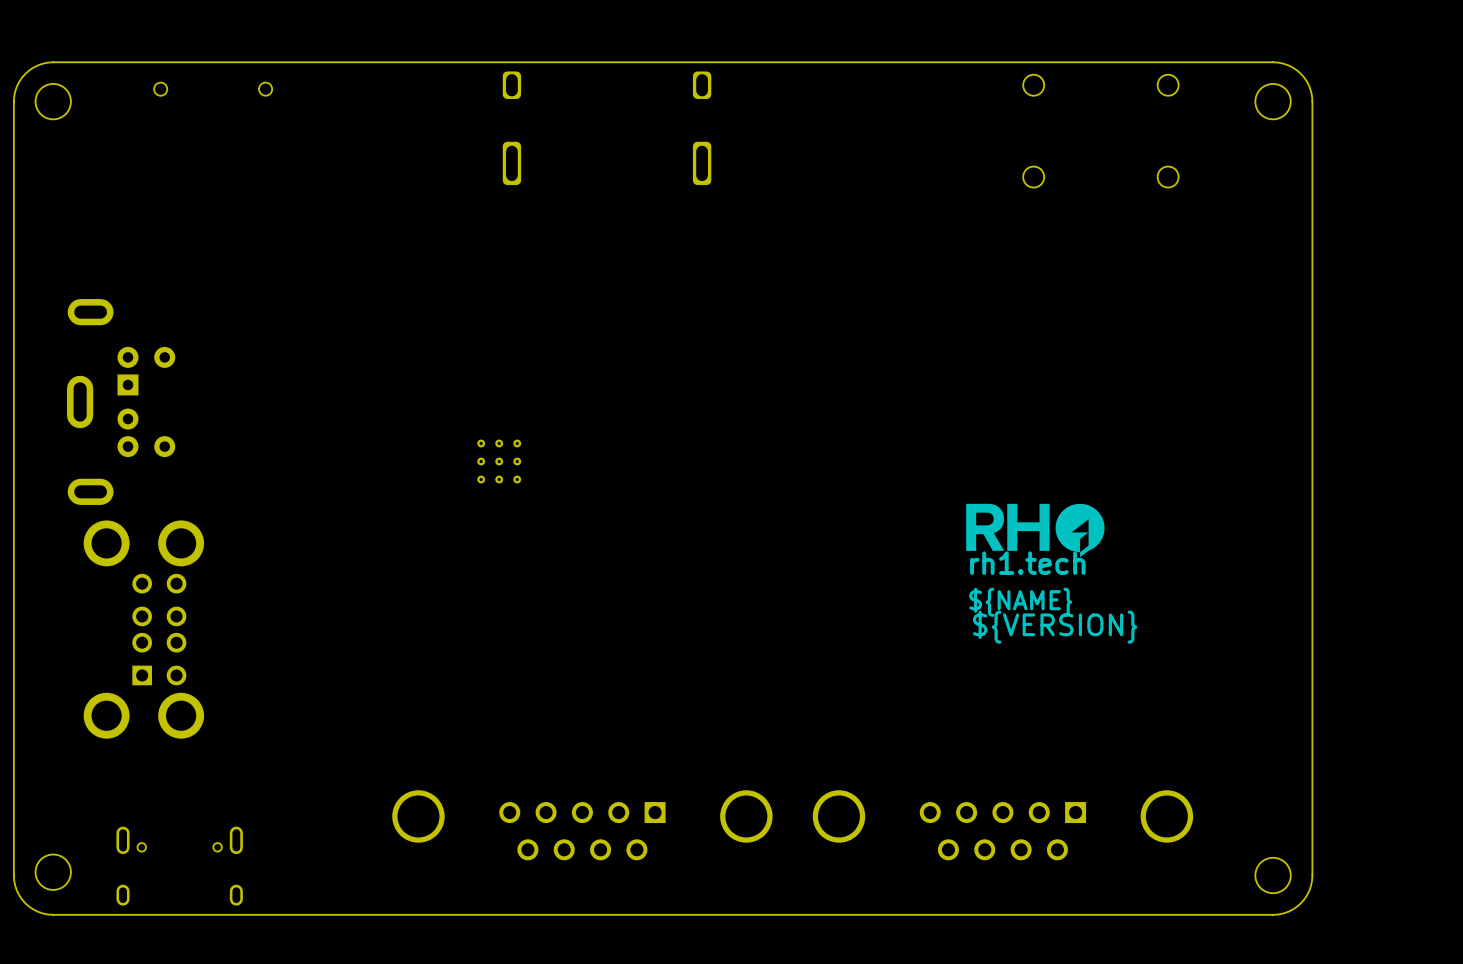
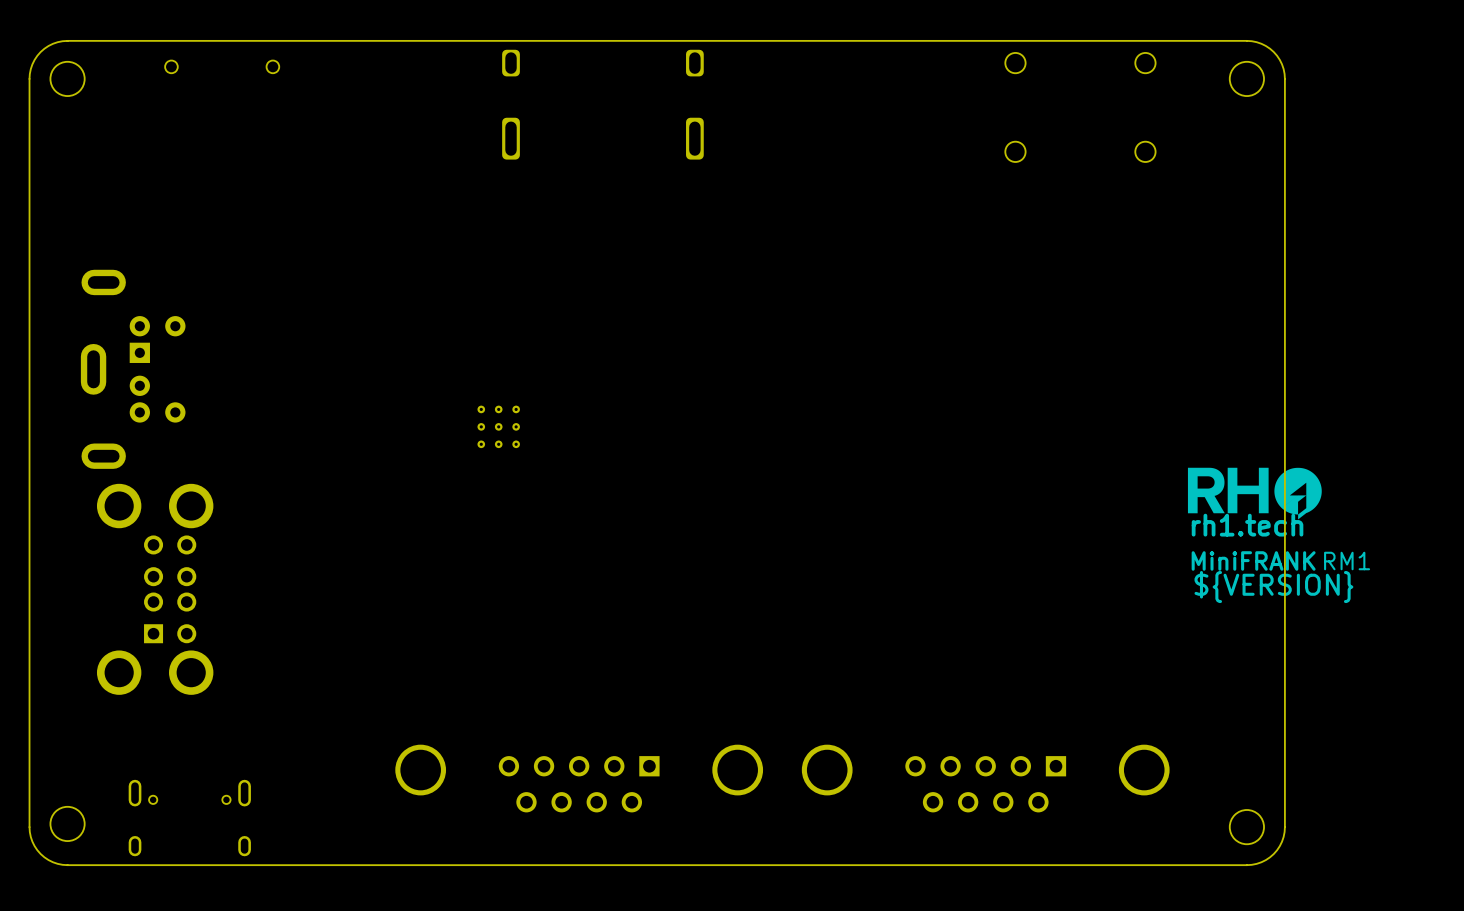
drawing position: (985, 527) -> (1206, 490)
drawing position: (1028, 527) -> (1248, 490)
drawing position: (1080, 530) -> (1298, 493)
drawing position: (1084, 535) -> (1302, 498)
drawing position: (1073, 545) -> (1291, 508)
text position: rh1.tech (1027, 563) -> rh1.tech (1247, 525)
text: none -> MiniFRANK (1253, 560)
text: none -> RM1 (1347, 560)
text: ${NAME} (1020, 602) -> none
text position: ${VERSION} (1055, 627) -> ${VERSION} (1273, 587)

